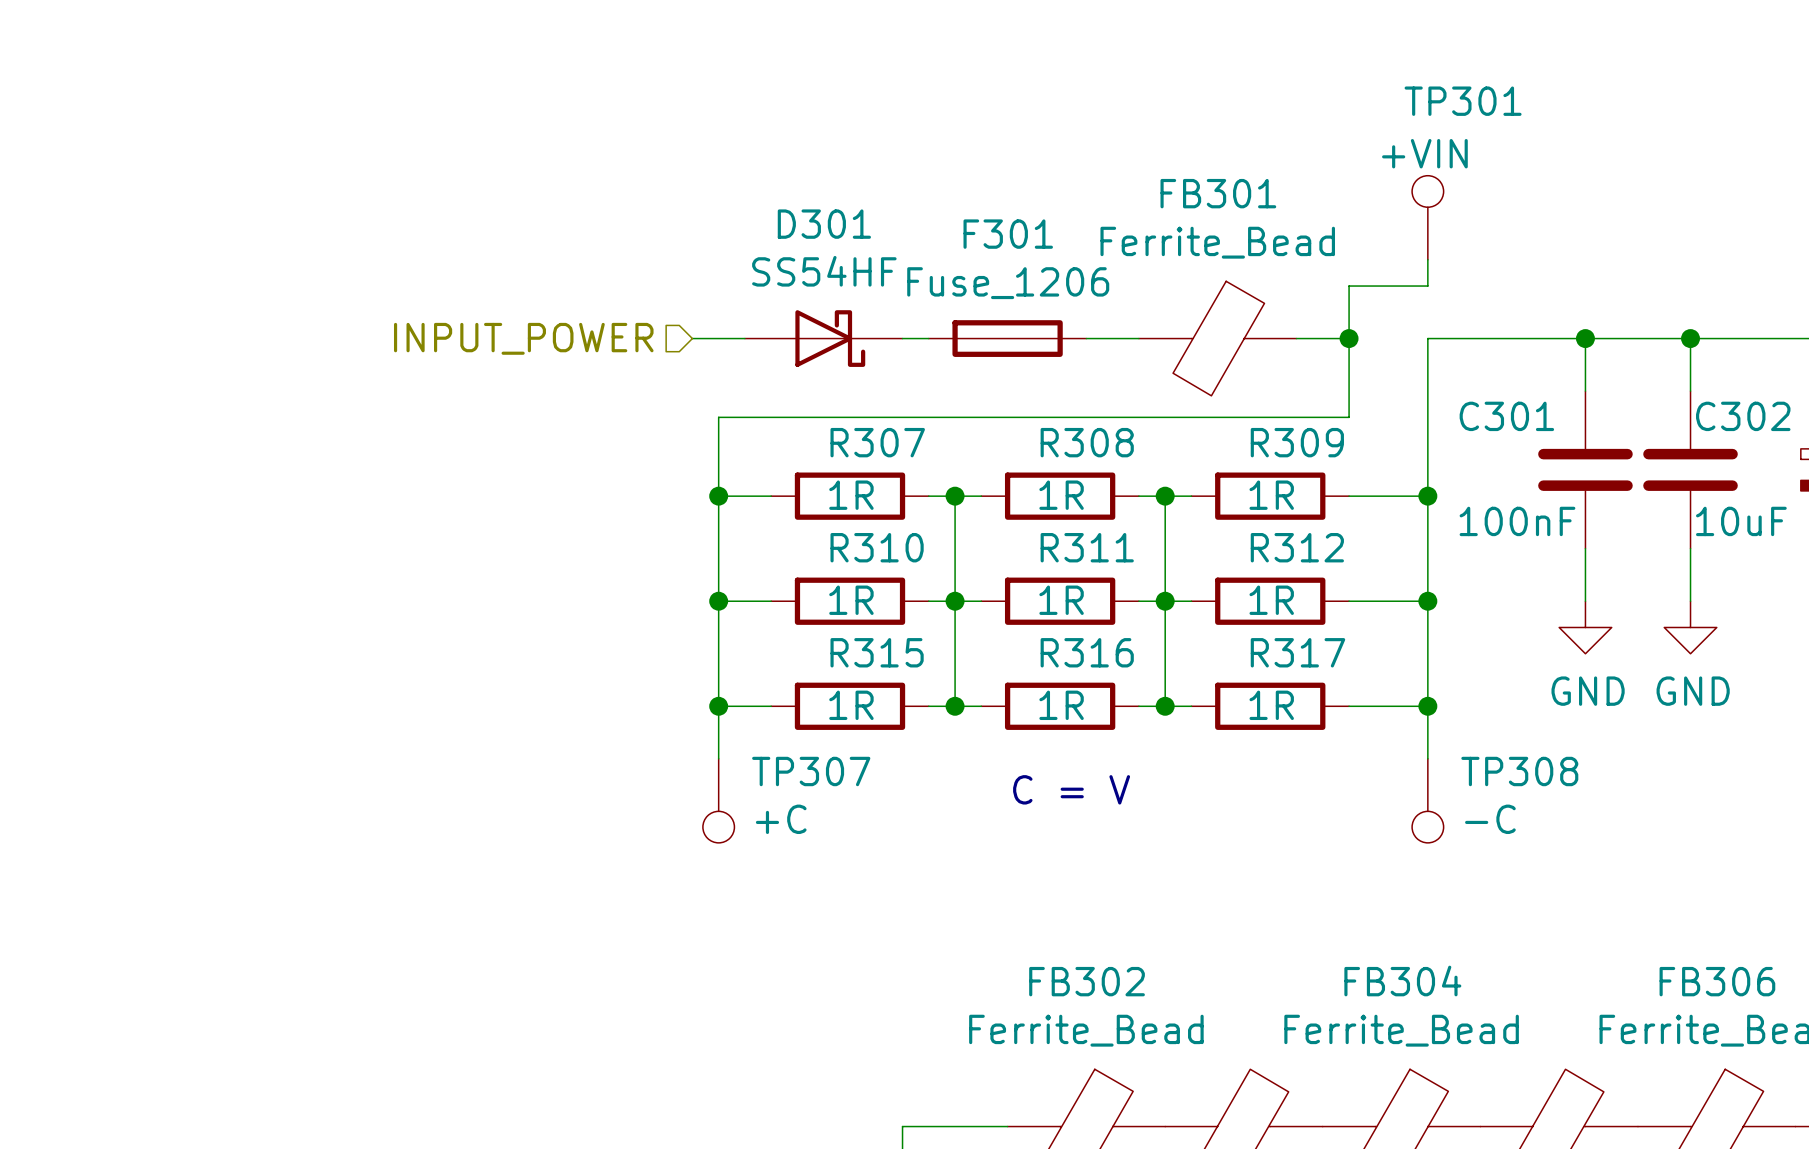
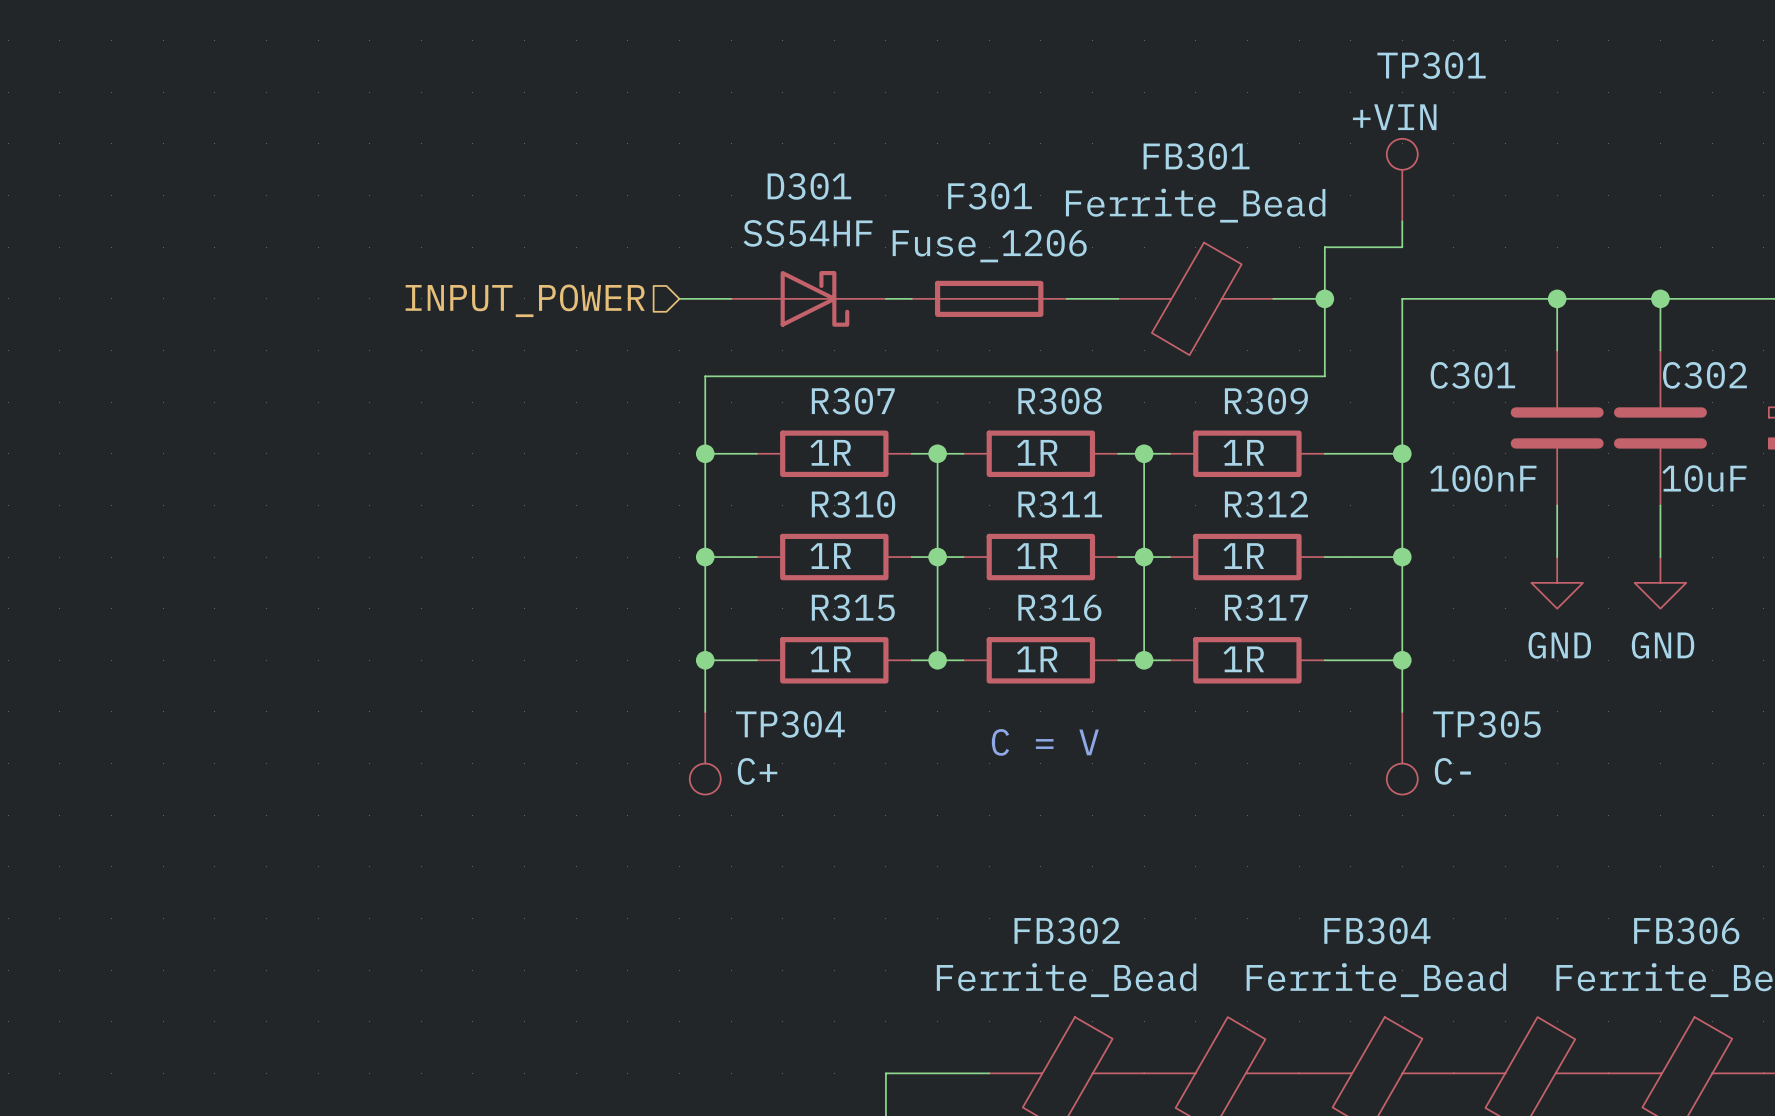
TP307 name: TP307 (811, 771) -> TP304 (790, 724)
TP308 name: TP308 (1519, 771) -> TP305 (1486, 724)
TP307 value: +C (781, 819) -> C+ (757, 771)
TP308 value: -C (1490, 819) -> C- (1452, 771)

